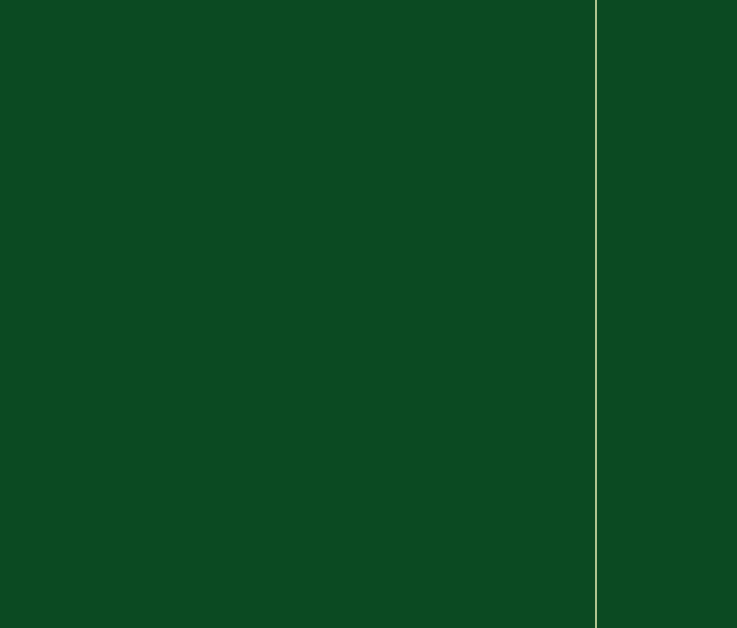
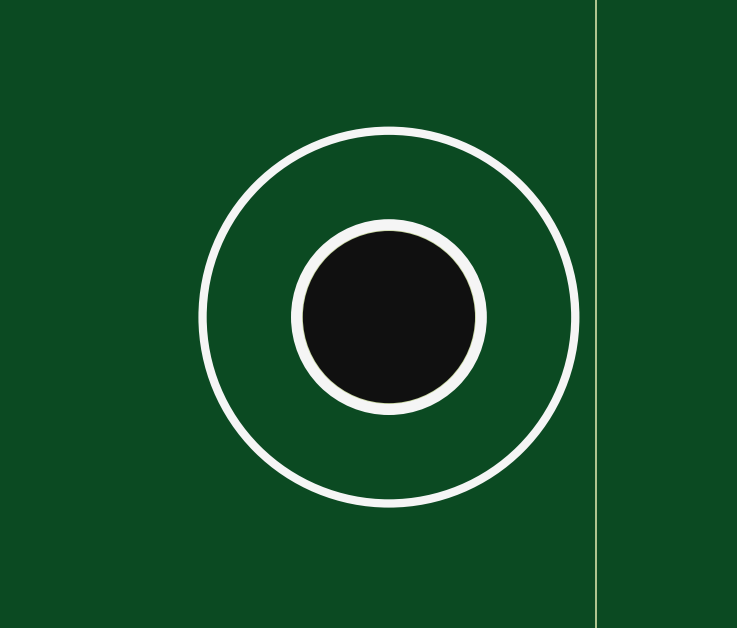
part: none -> (388, 317)

